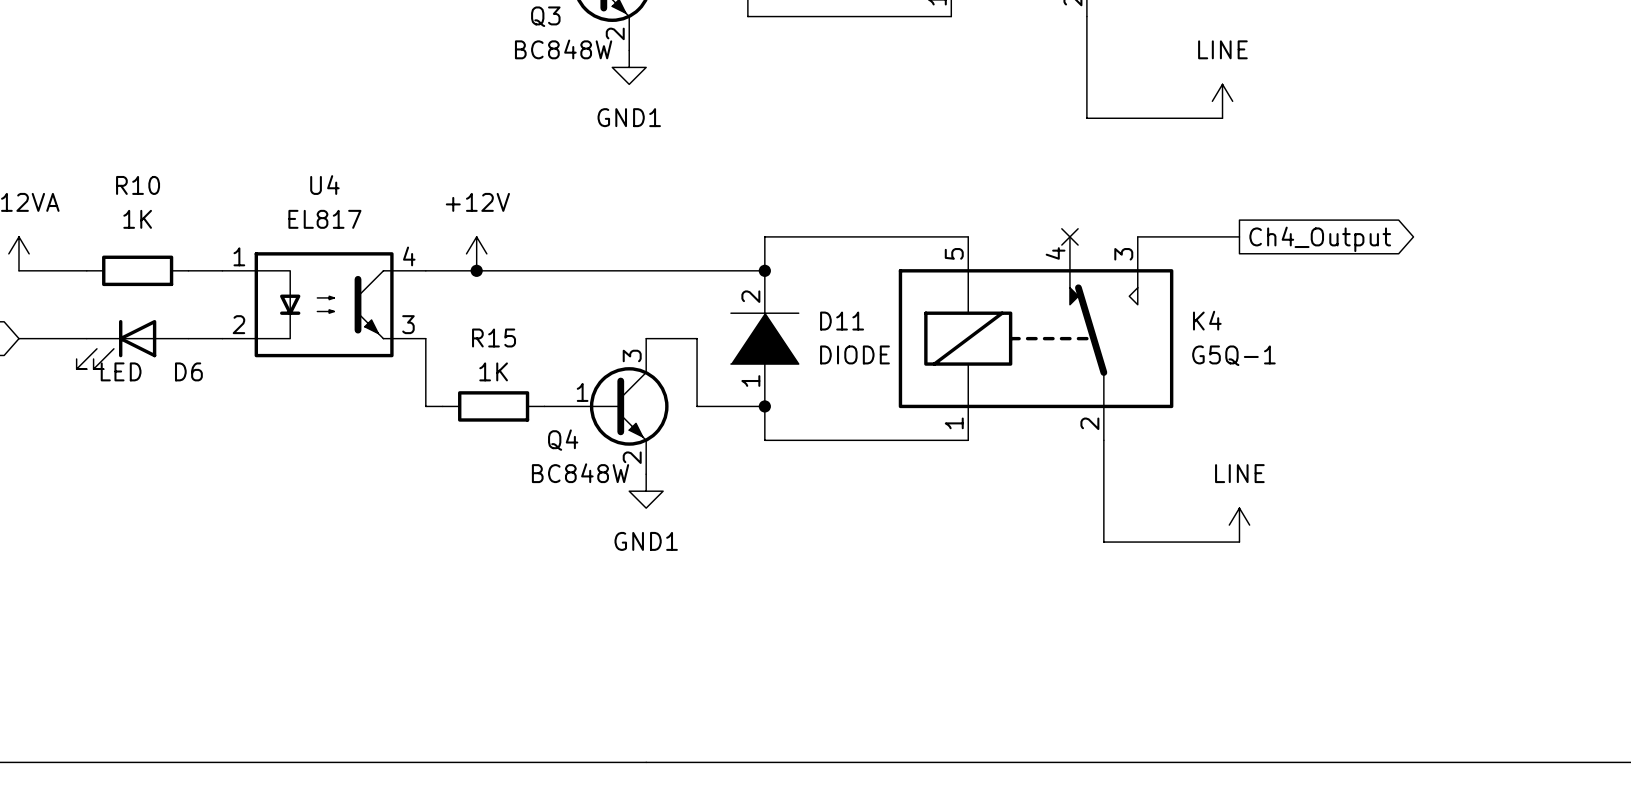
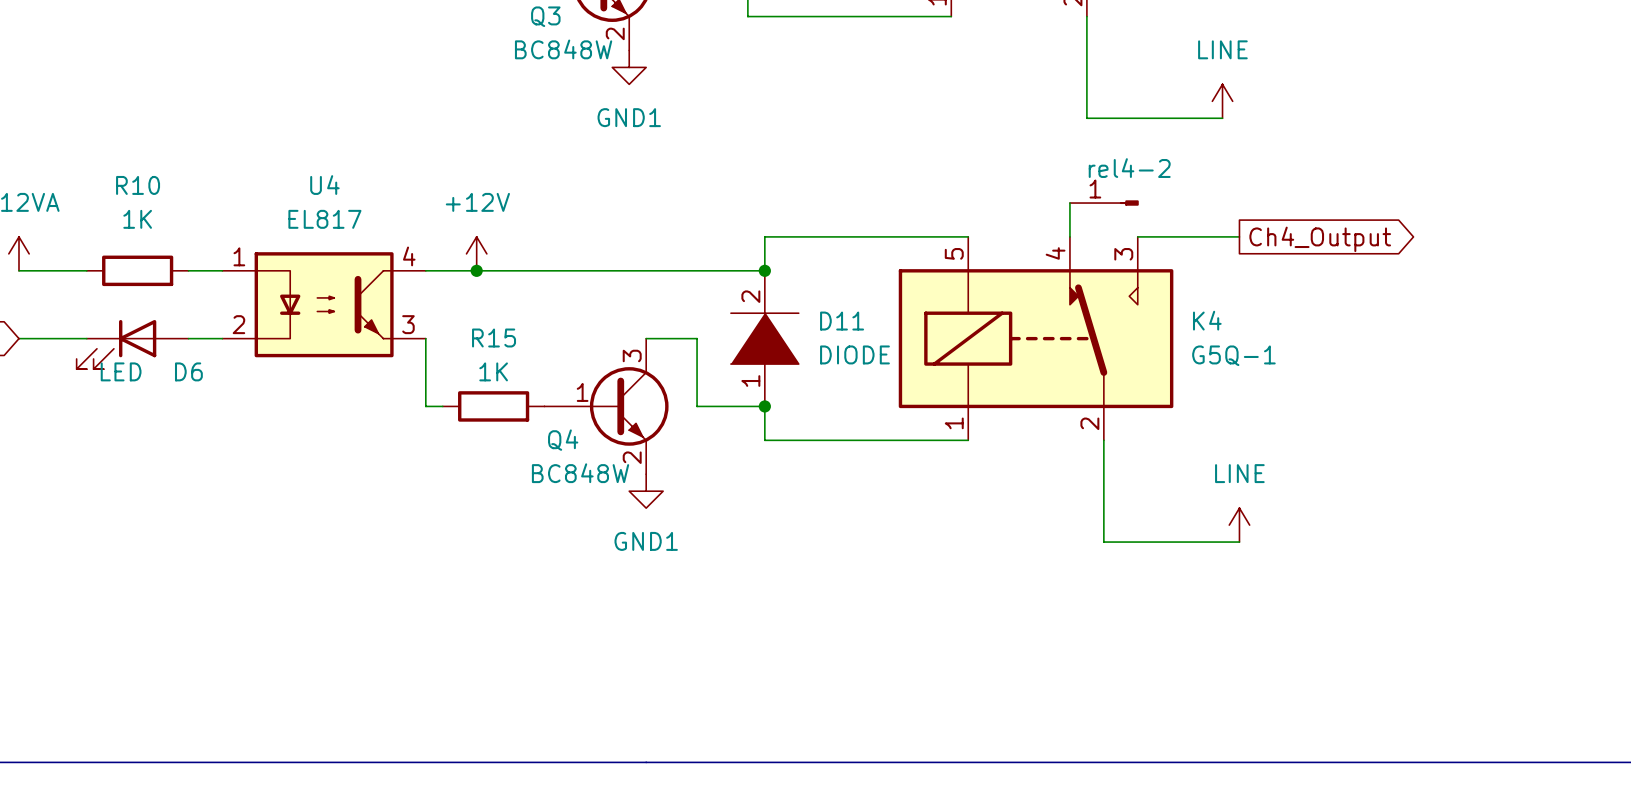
wire: none -> (1069, 203) (1069, 236)
rel4-2: none -> (1104, 203)
no-connect mark: (1069, 236) -> none

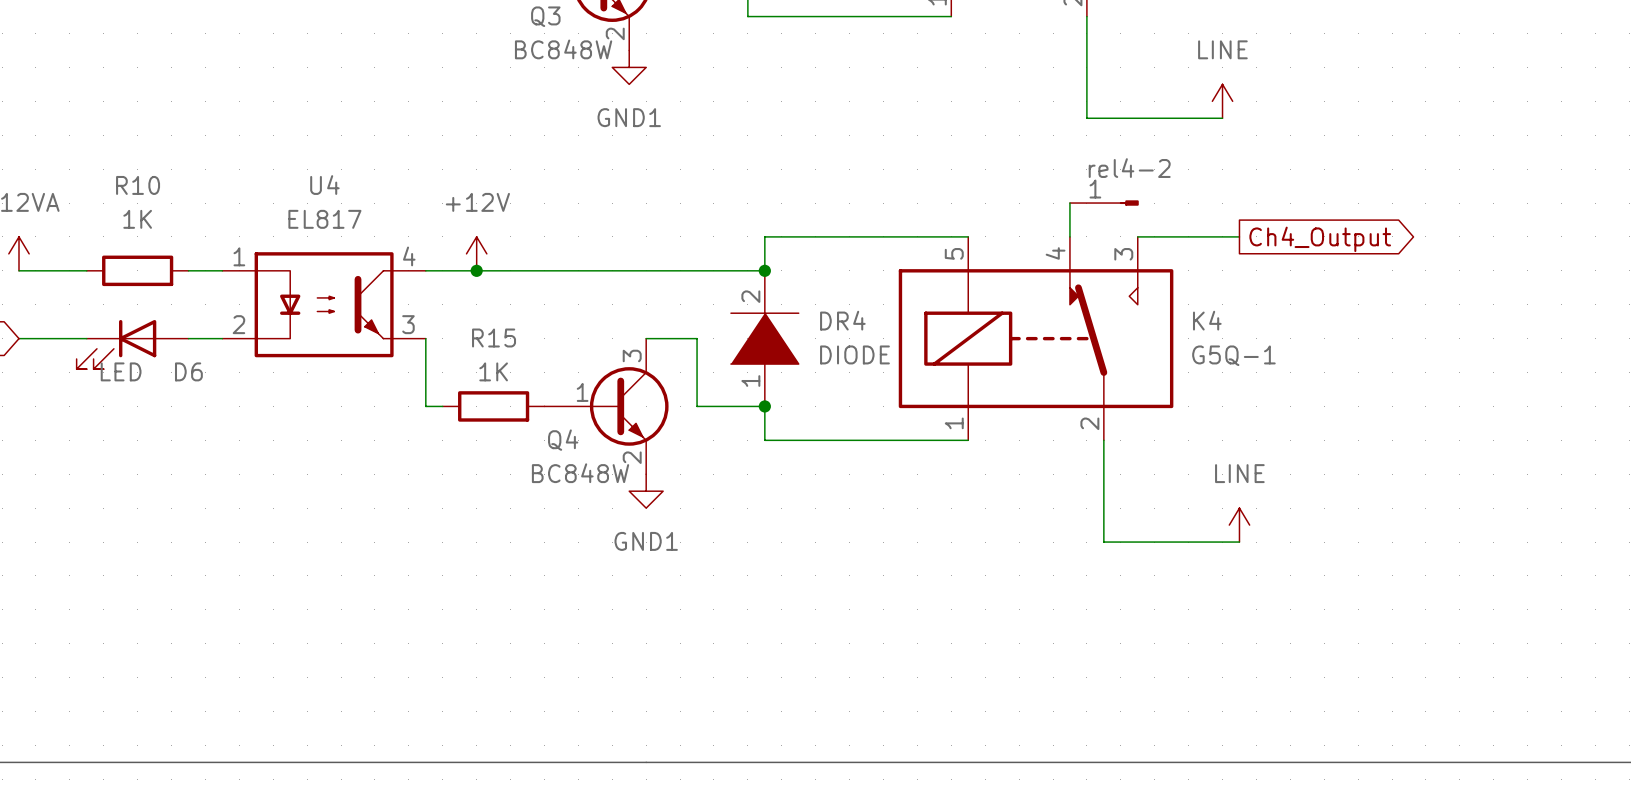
D11 name: D11 (842, 321) -> DR4 (842, 320)

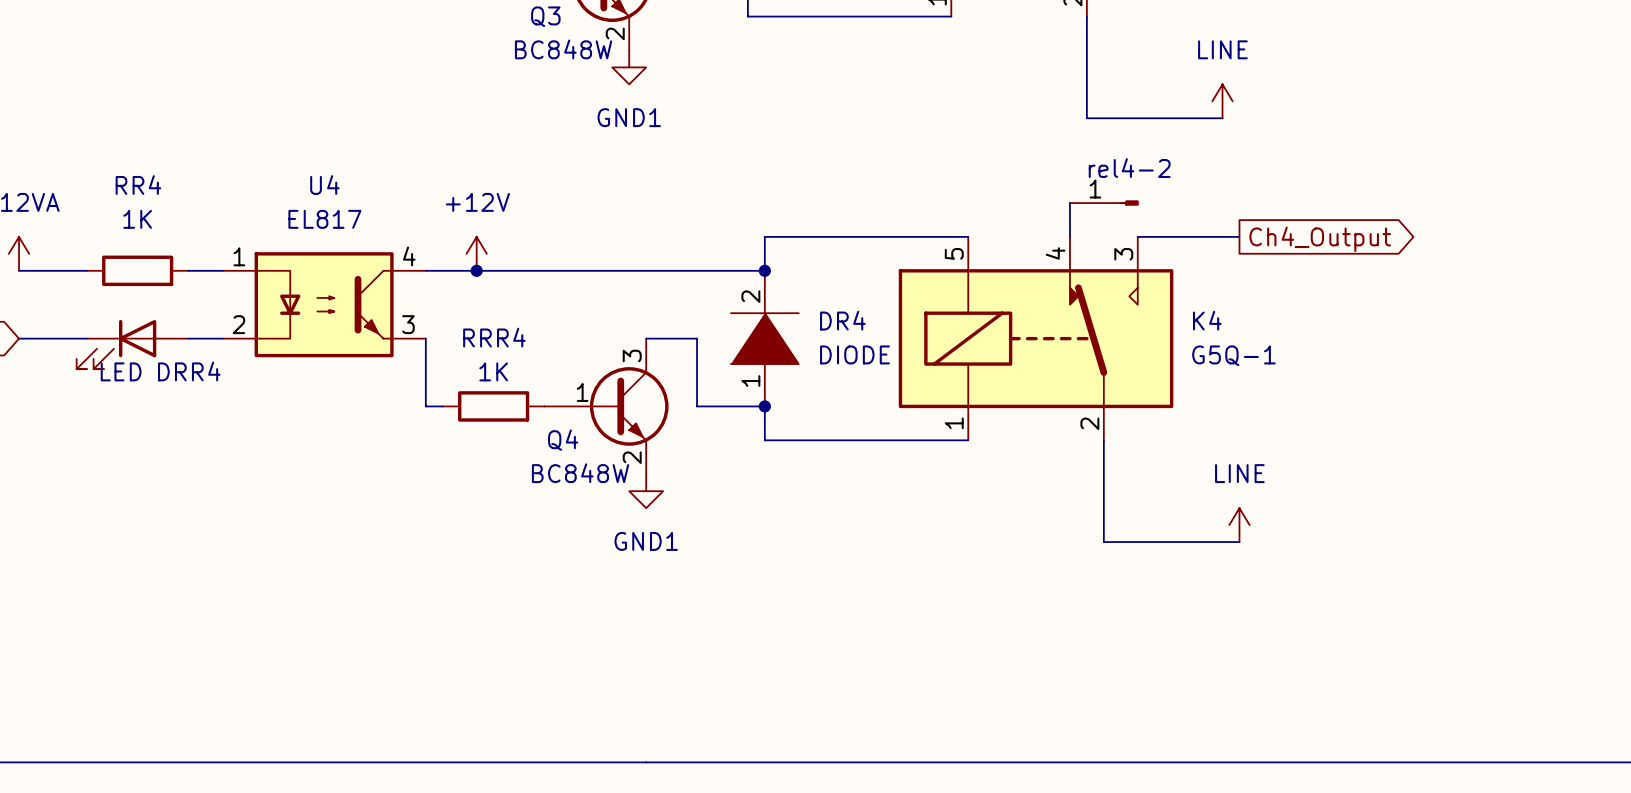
R10 name: R10 (138, 185) -> RR4 (138, 185)
R15 name: R15 (494, 337) -> RRR4 (494, 337)
D6 name: D6 (188, 371) -> DRR4 (189, 371)

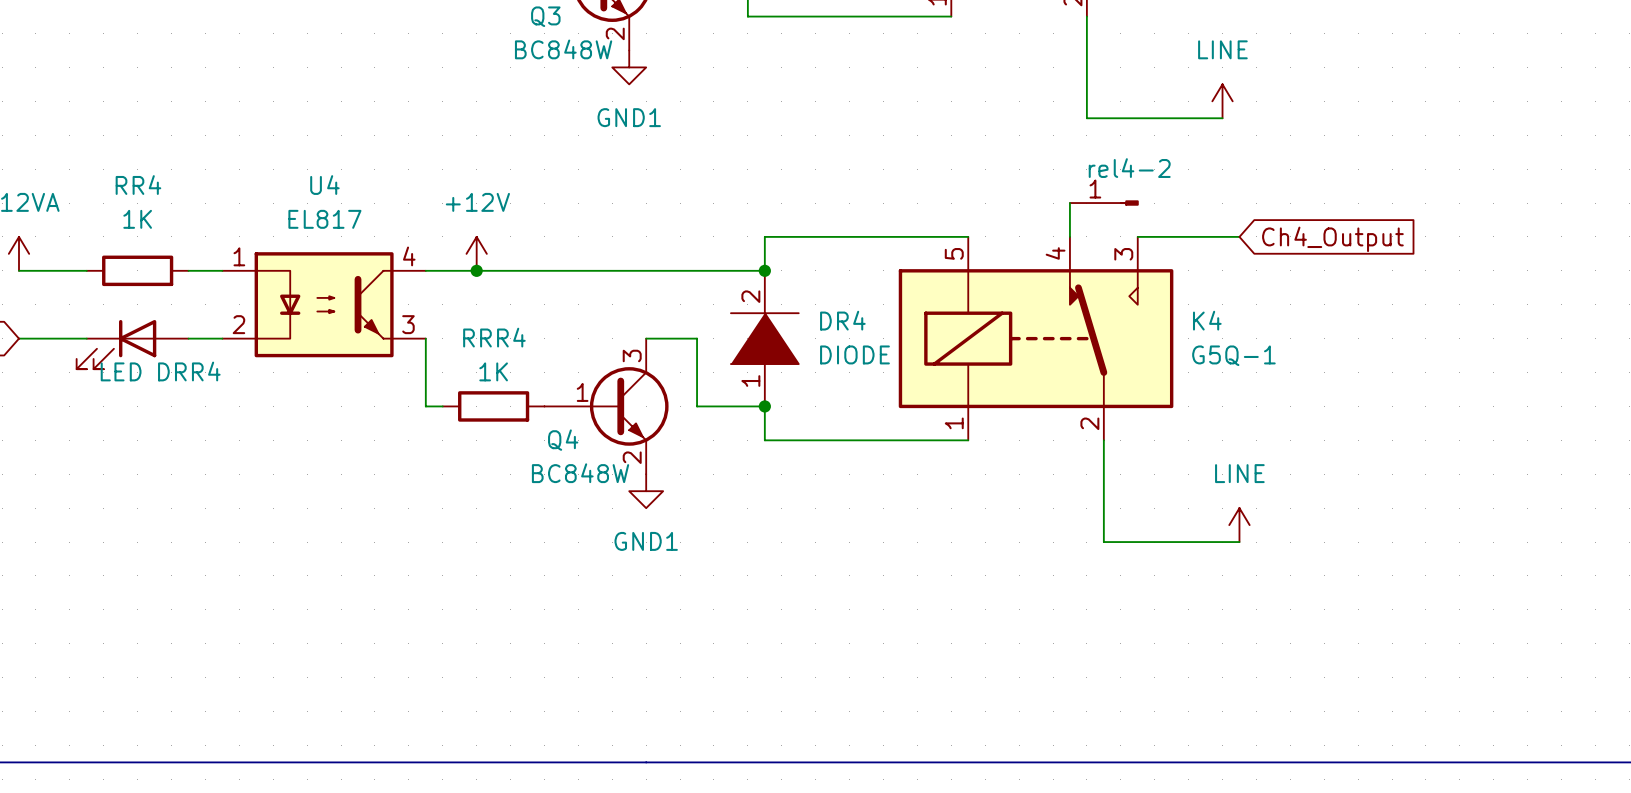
global label shape: output (1320, 239) -> input (1332, 239)

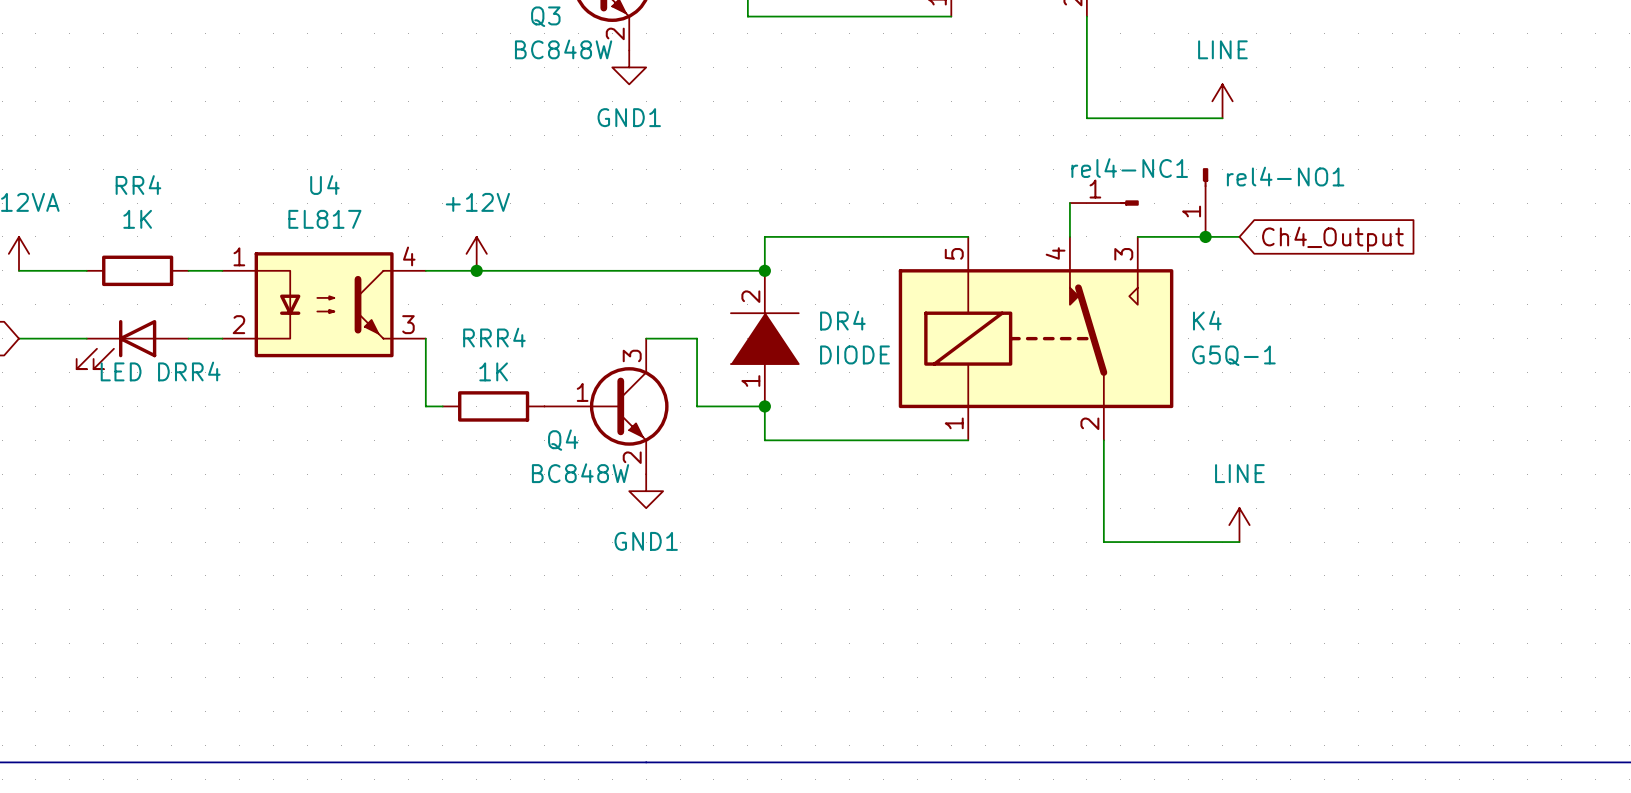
rel4-2 name: rel4-2 (1129, 168) -> rel4-NC1 (1129, 168)
rel4-NO1: none -> (1205, 202)
junction: none -> (1205, 236)

